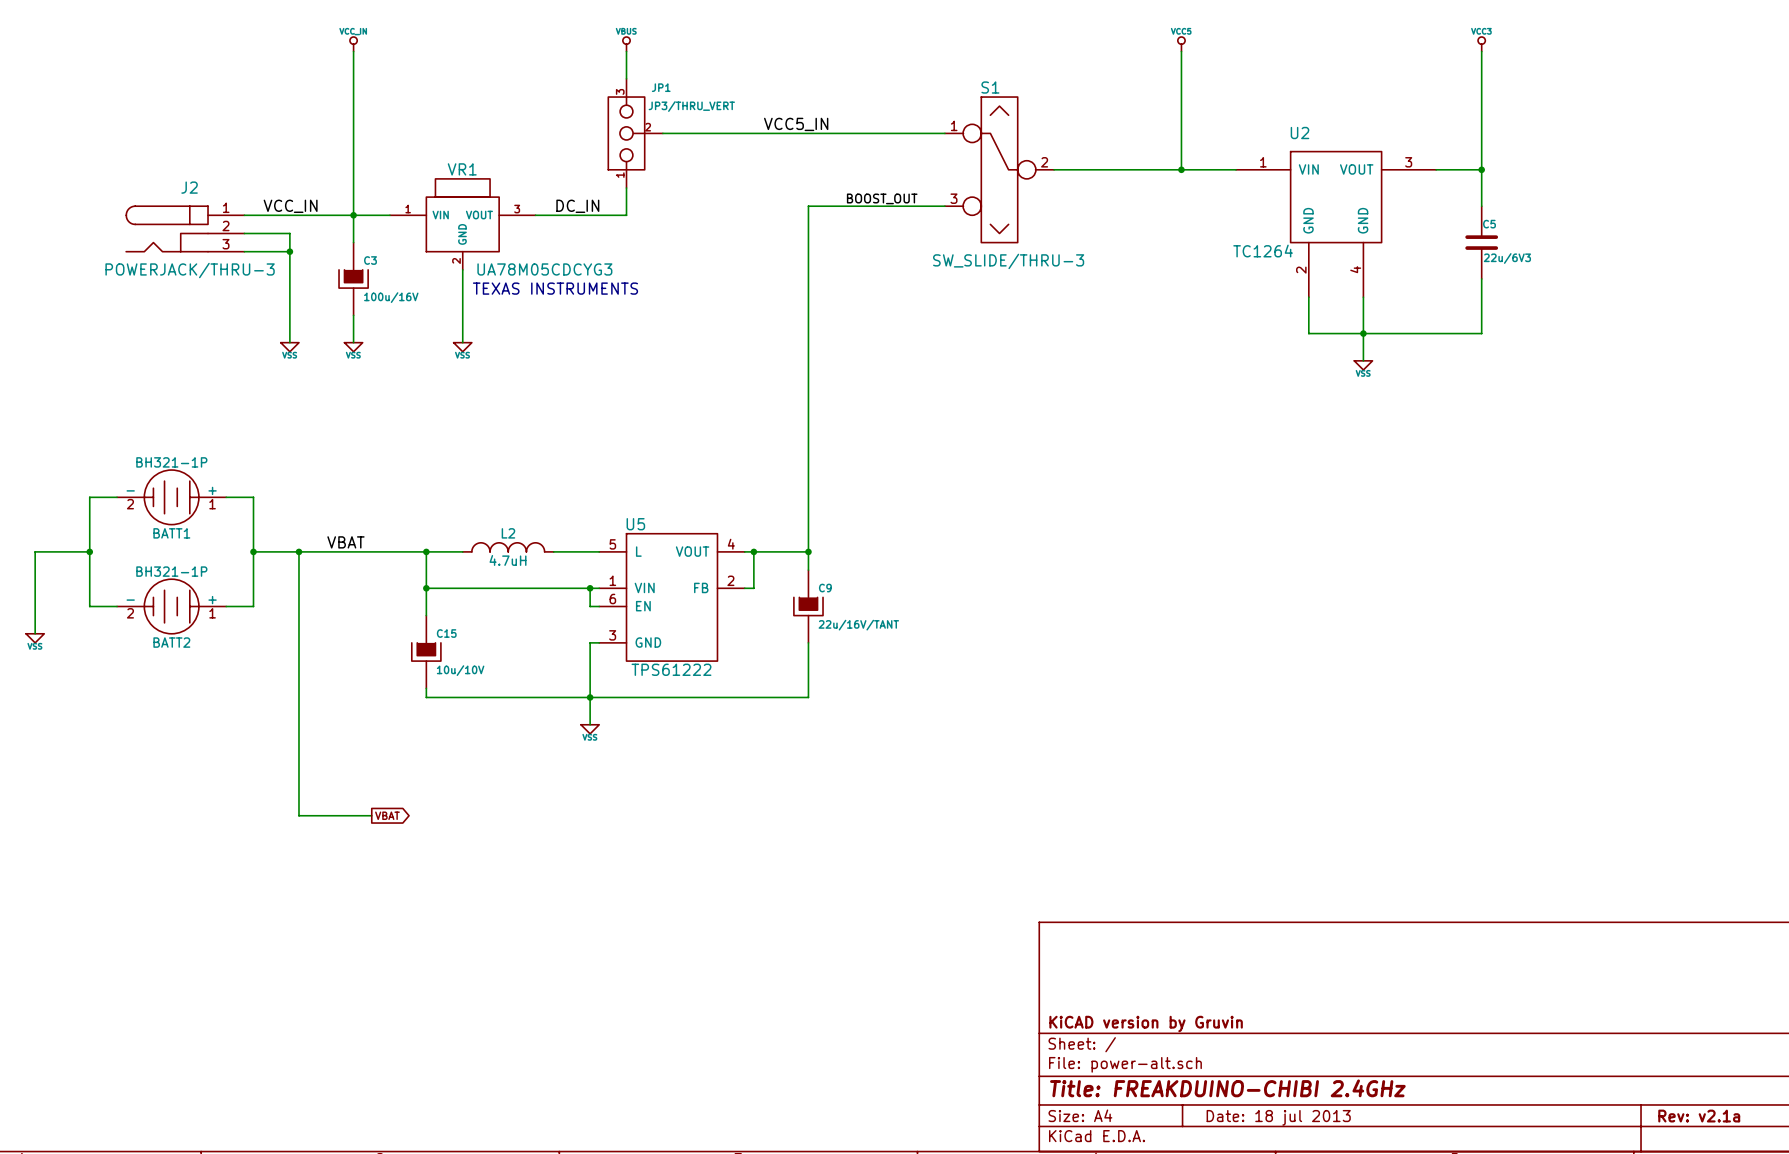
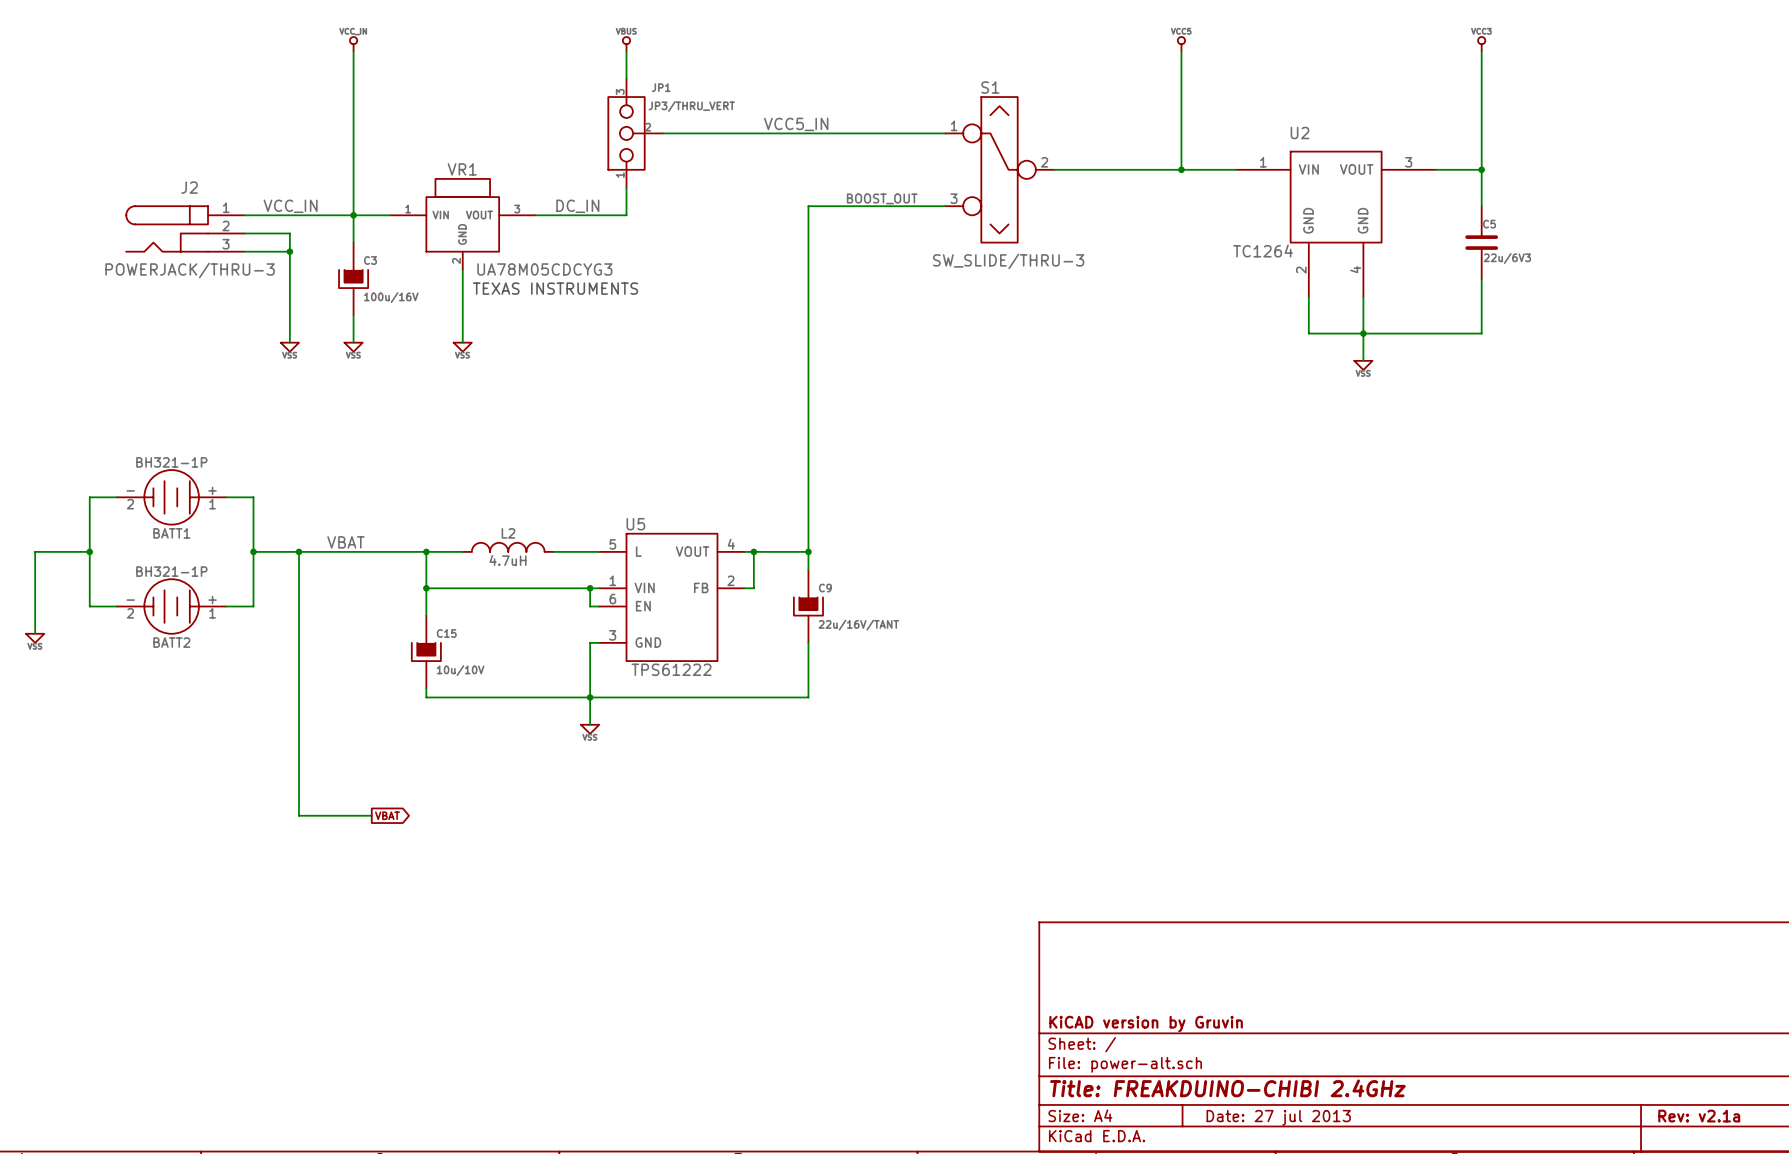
title block: Date: 18 jul 2013 (1278, 1117) -> Date: 27 jul 2013 (1278, 1117)

